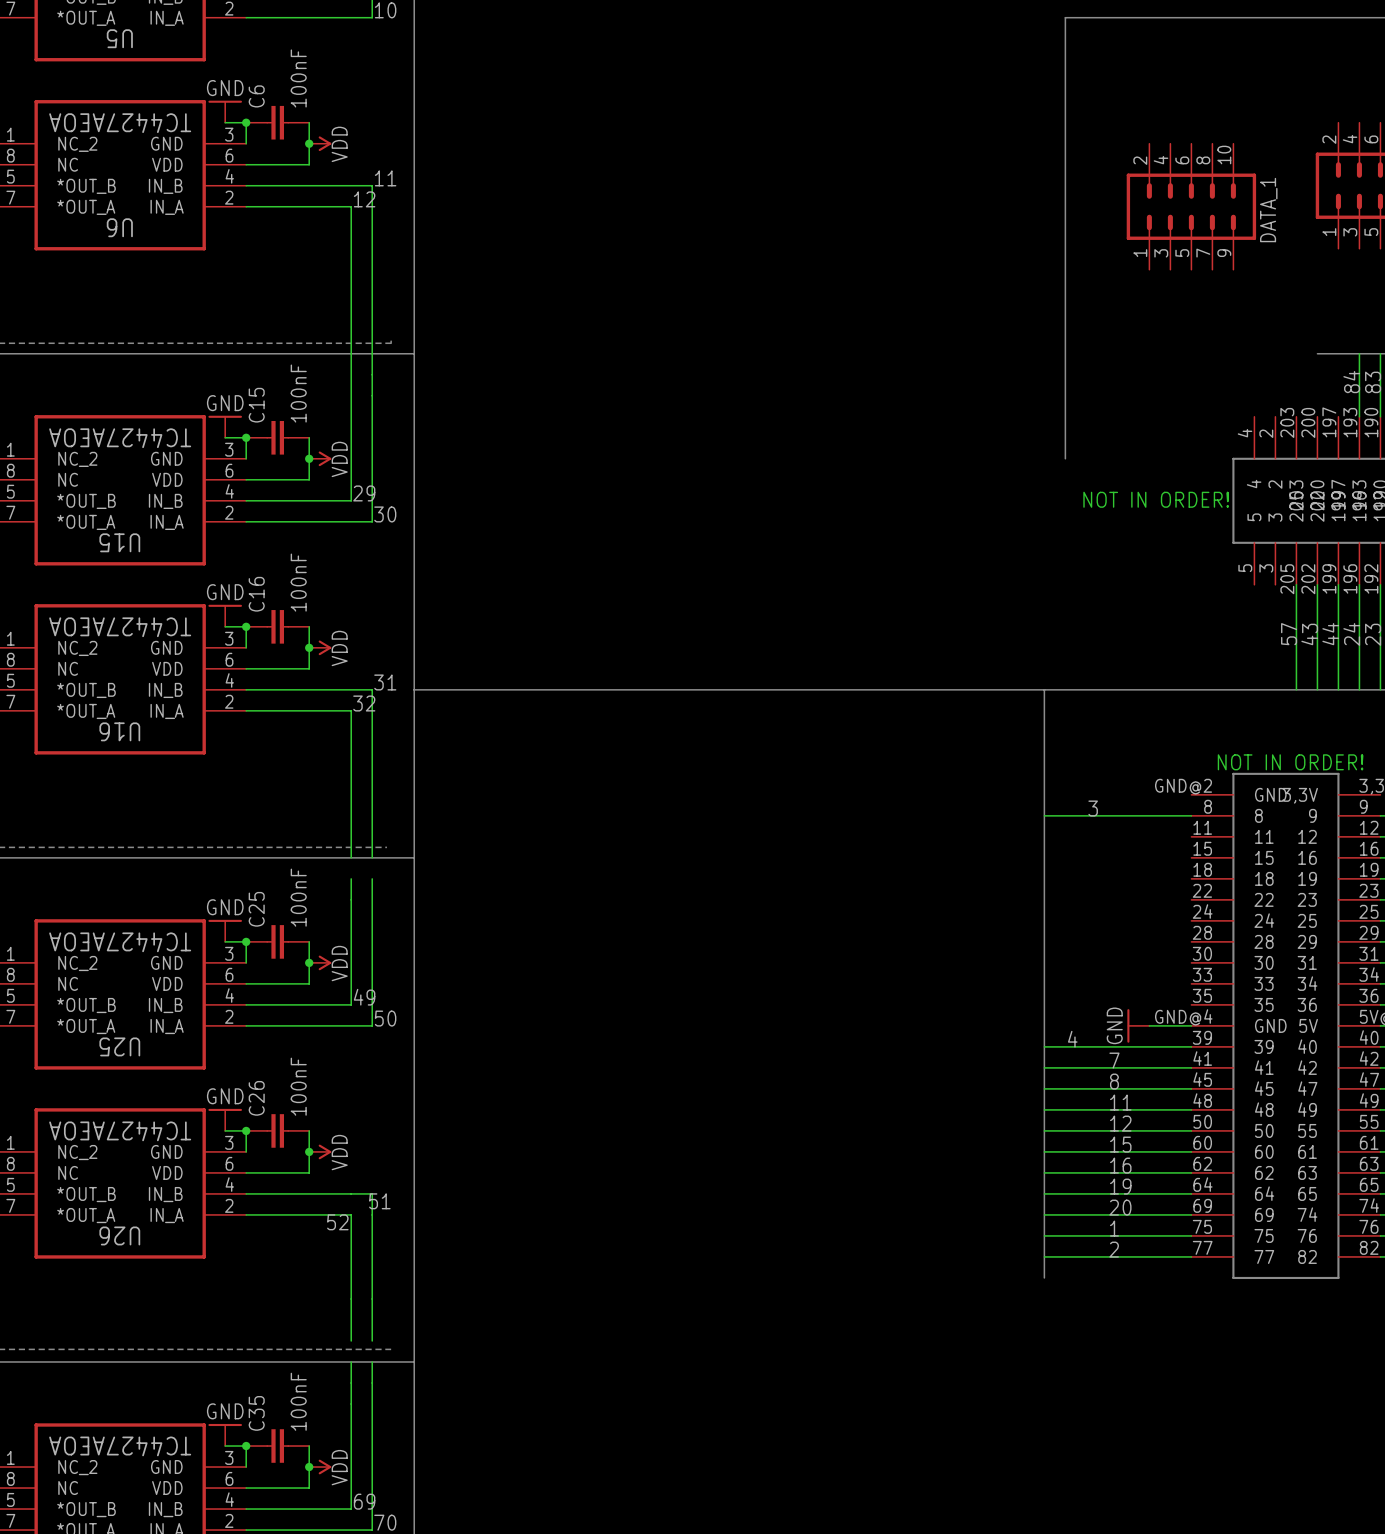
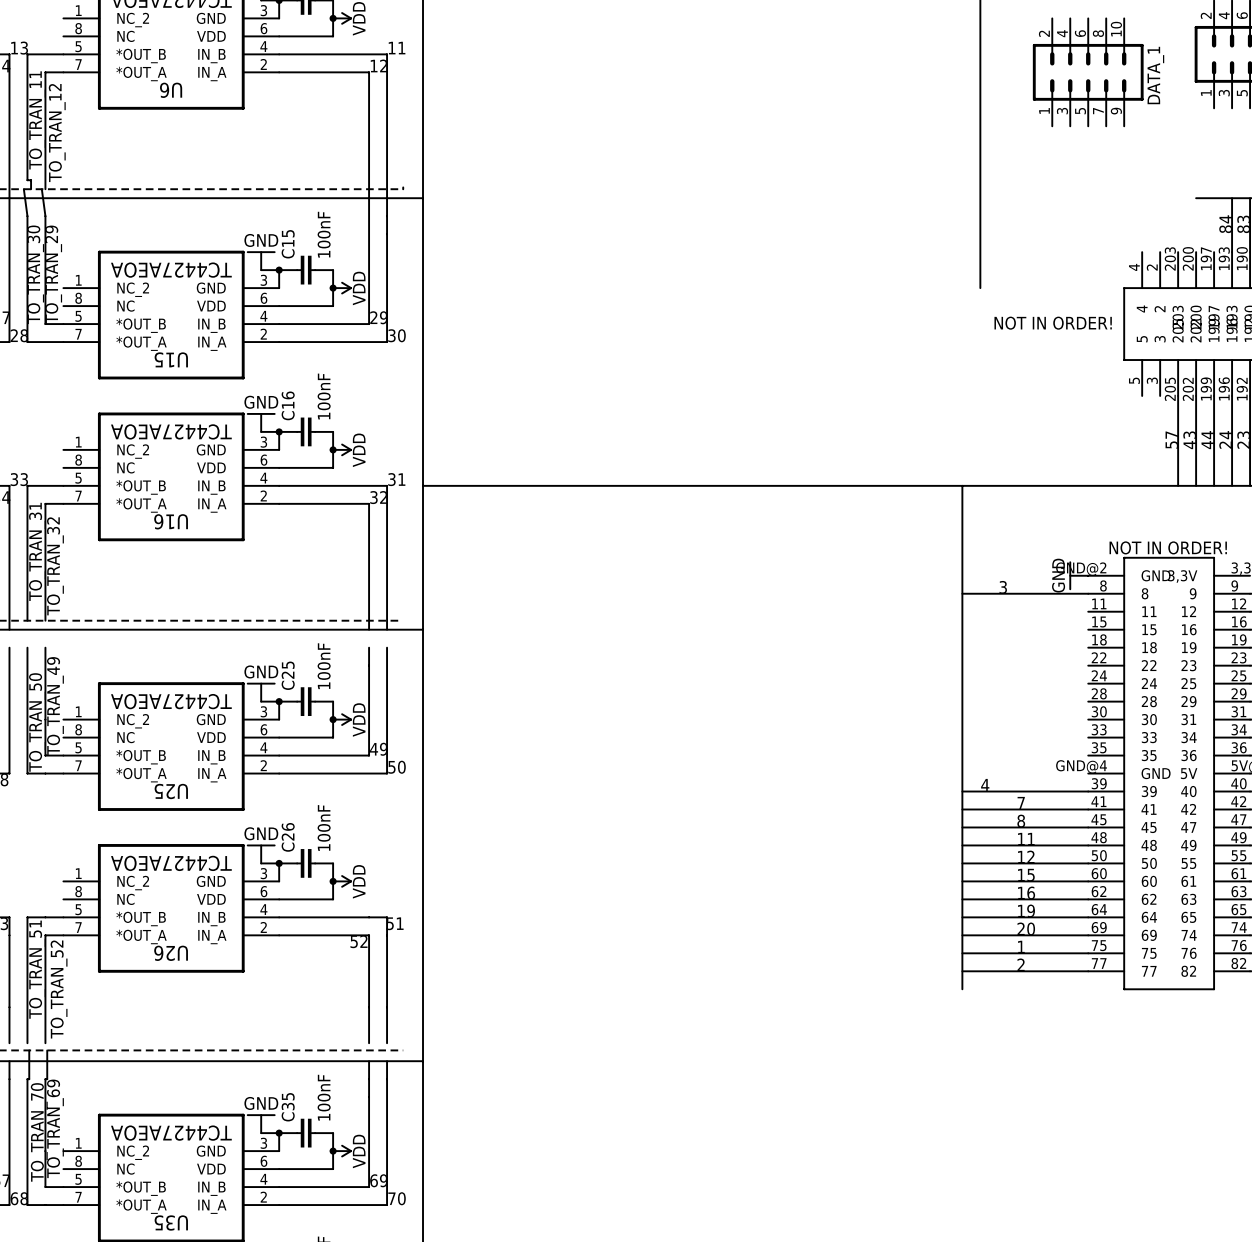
power symbol: none -> GND (1078, 575)
power symbol: GND (1138, 1025) -> none
wire: (1149, 1025) (1191, 1025) -> none

